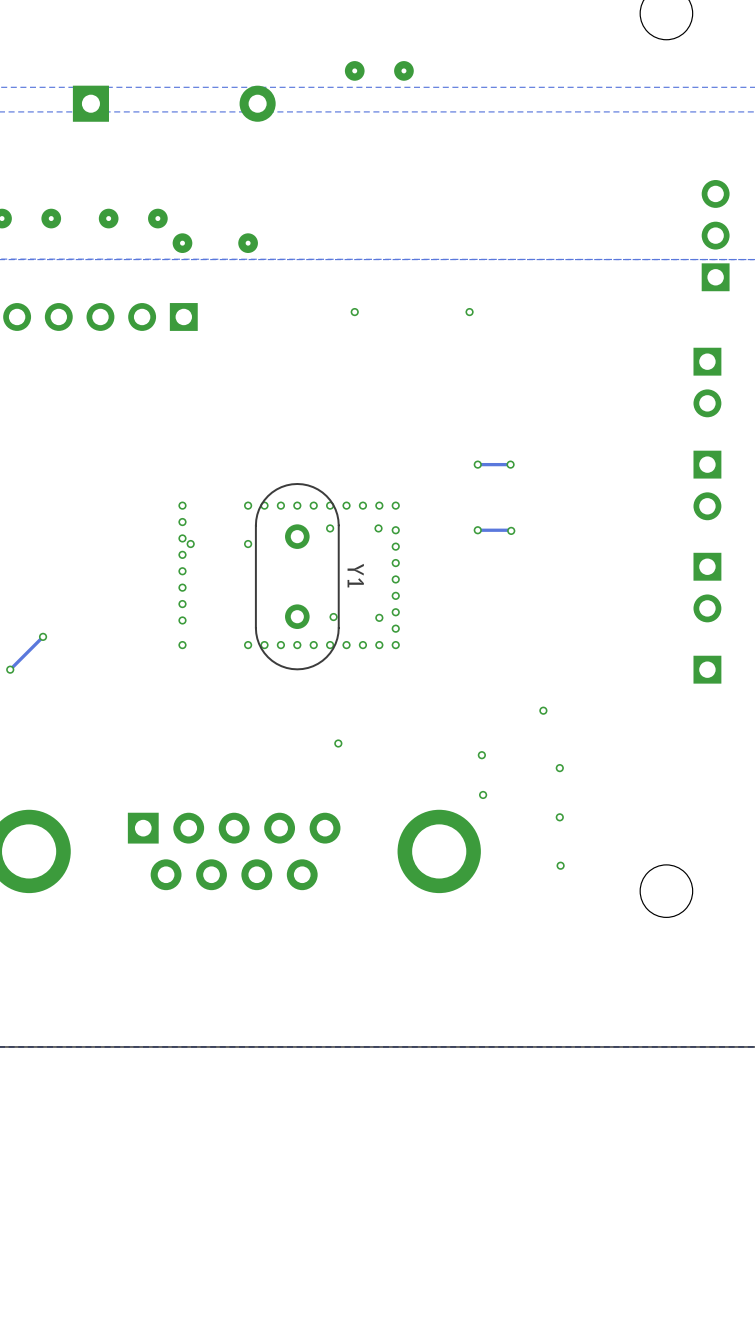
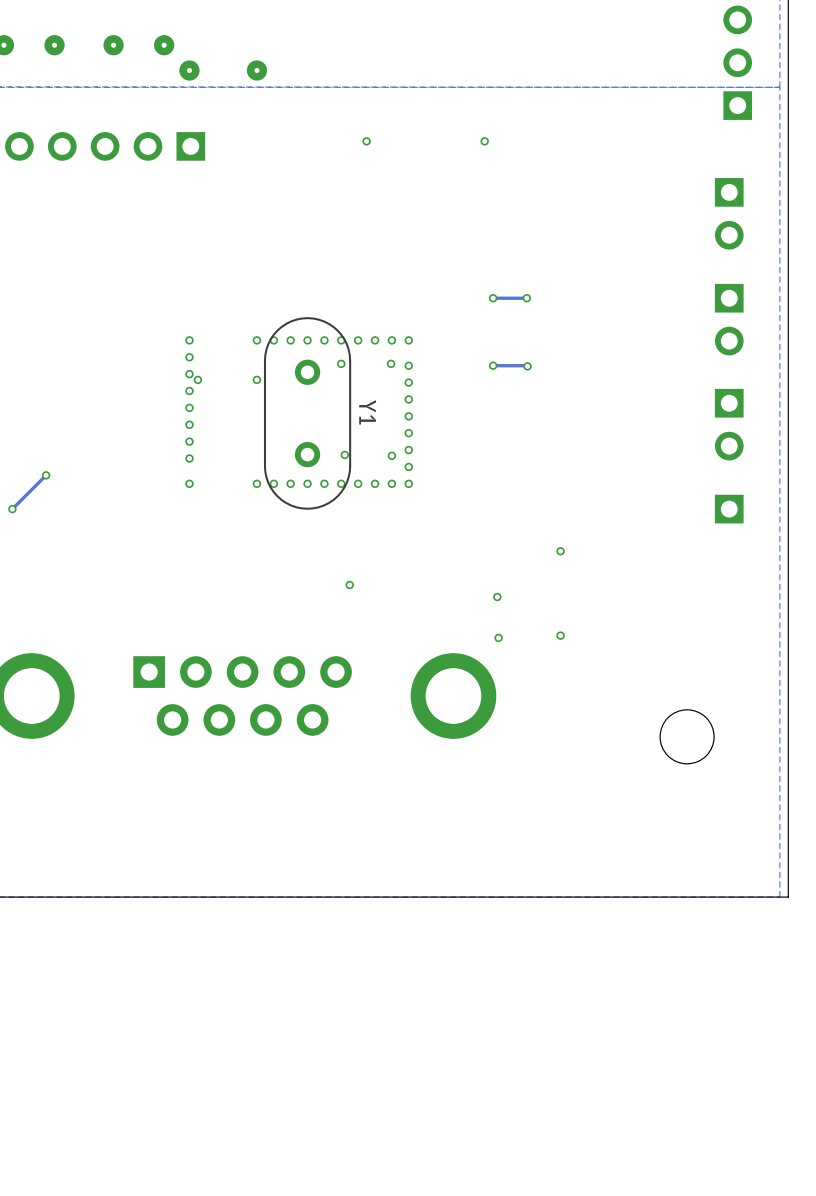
via: (559, 768) -> none
via: none -> (560, 635)
via: (559, 817) -> none
via: (560, 865) -> none

